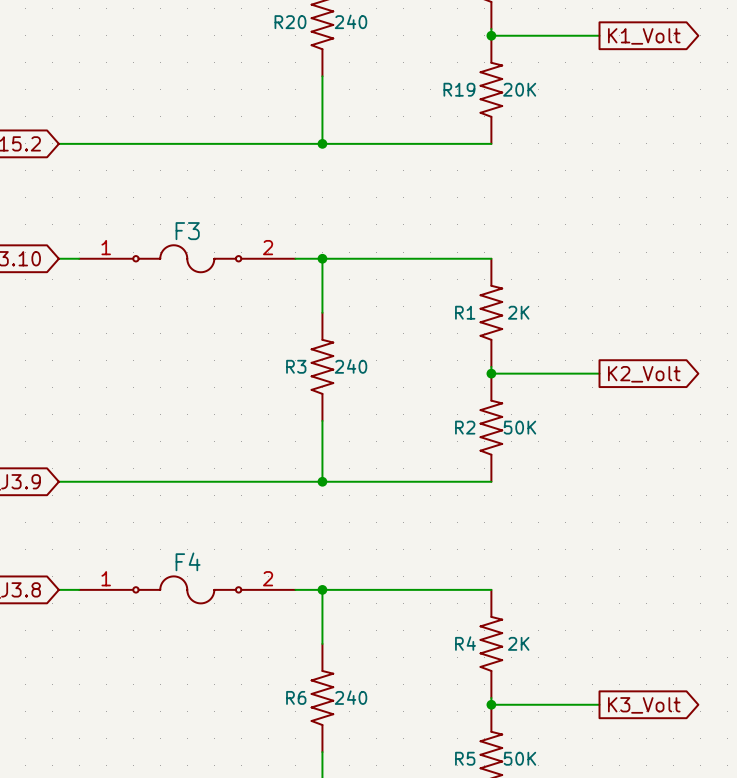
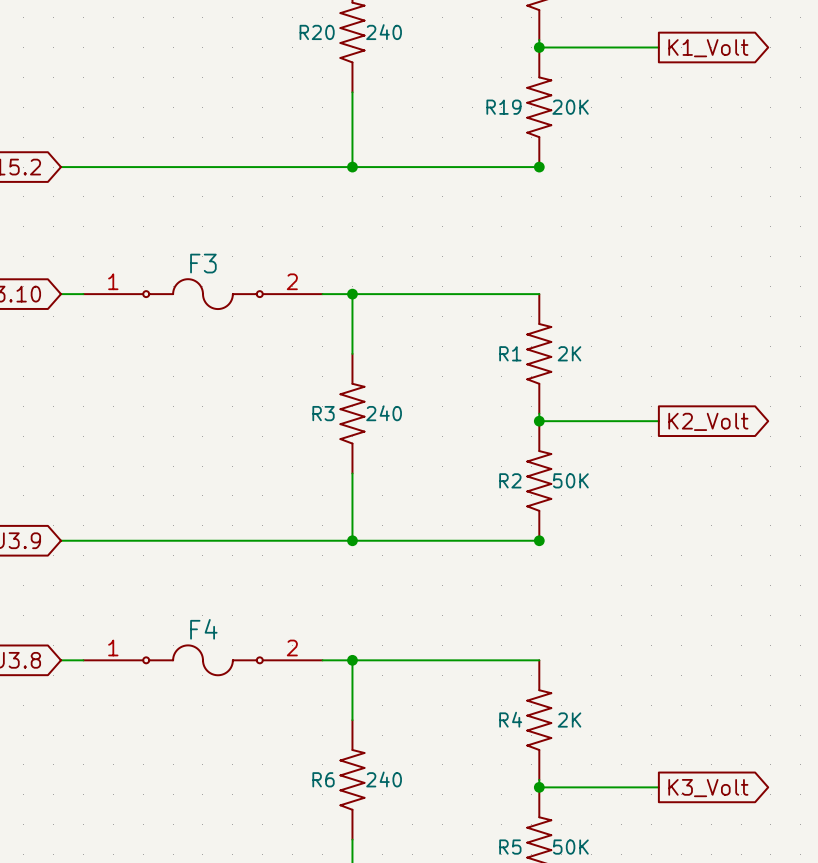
junction: none -> (539, 167)
junction: none -> (539, 540)

